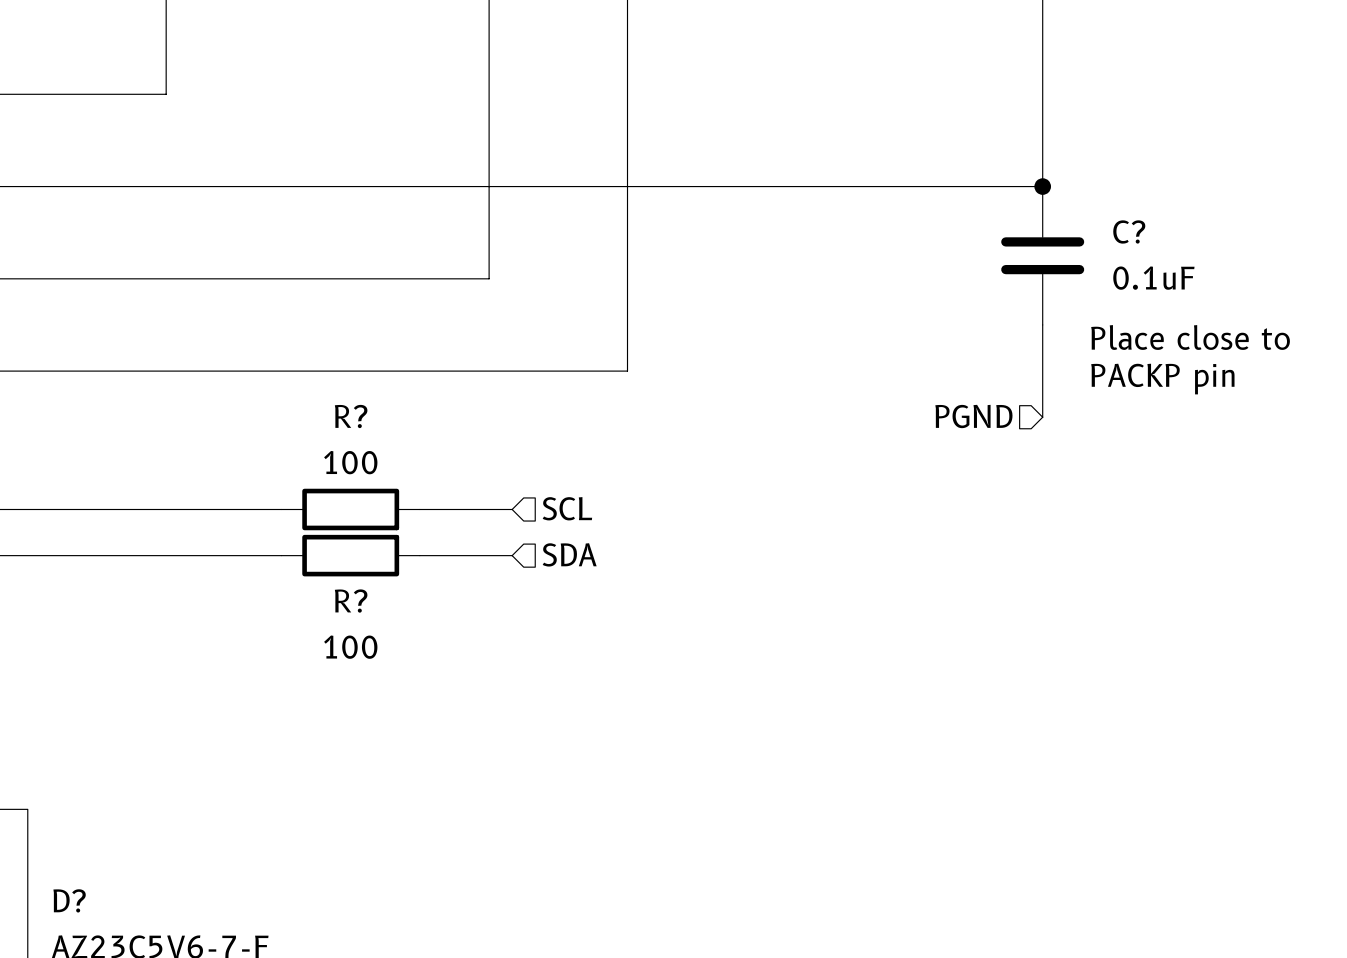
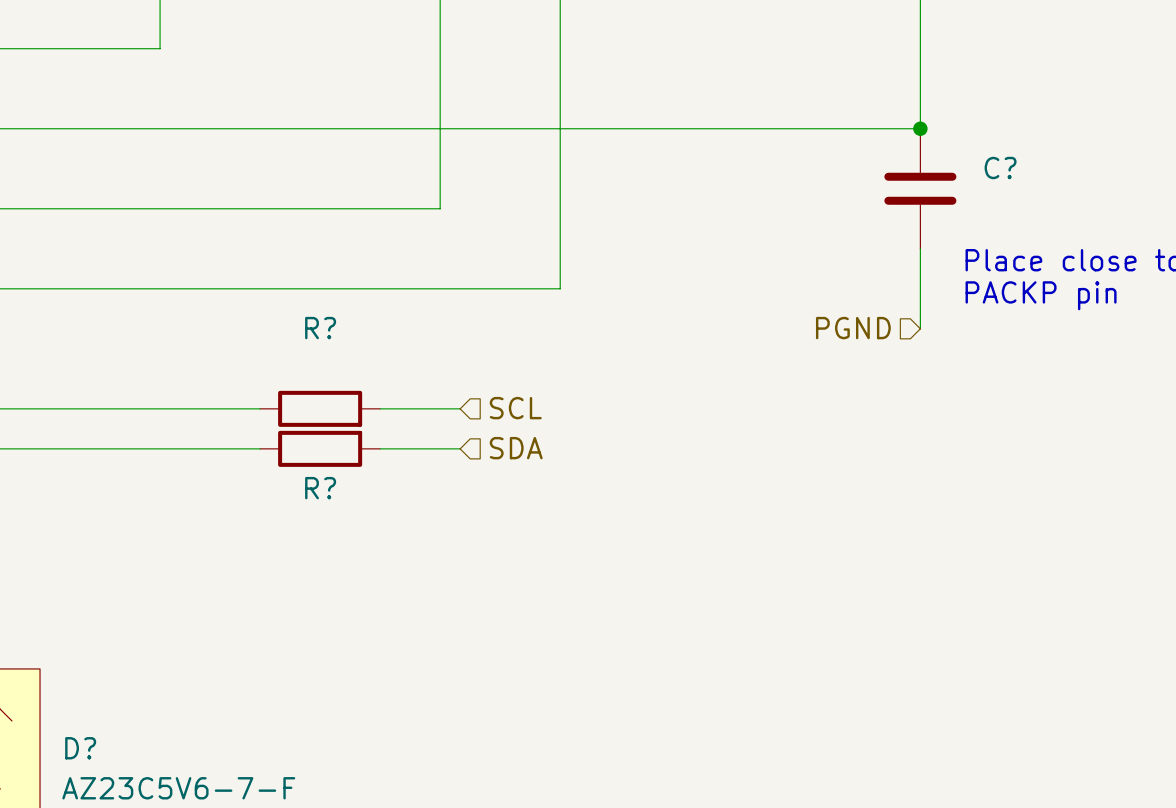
C? value: 0.1uF (1153, 278) -> none
R? value: 100 (350, 462) -> none
R? value: 100 (350, 647) -> none

